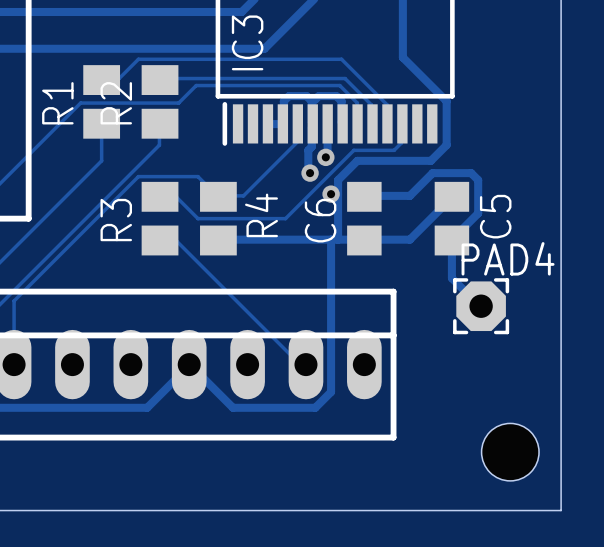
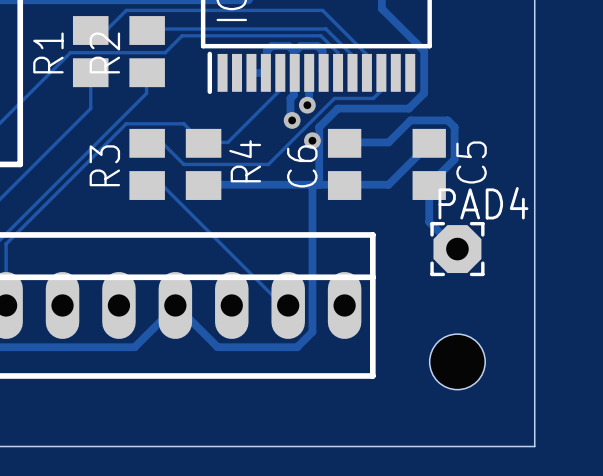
hole position: (510, 452) -> (457, 361)

